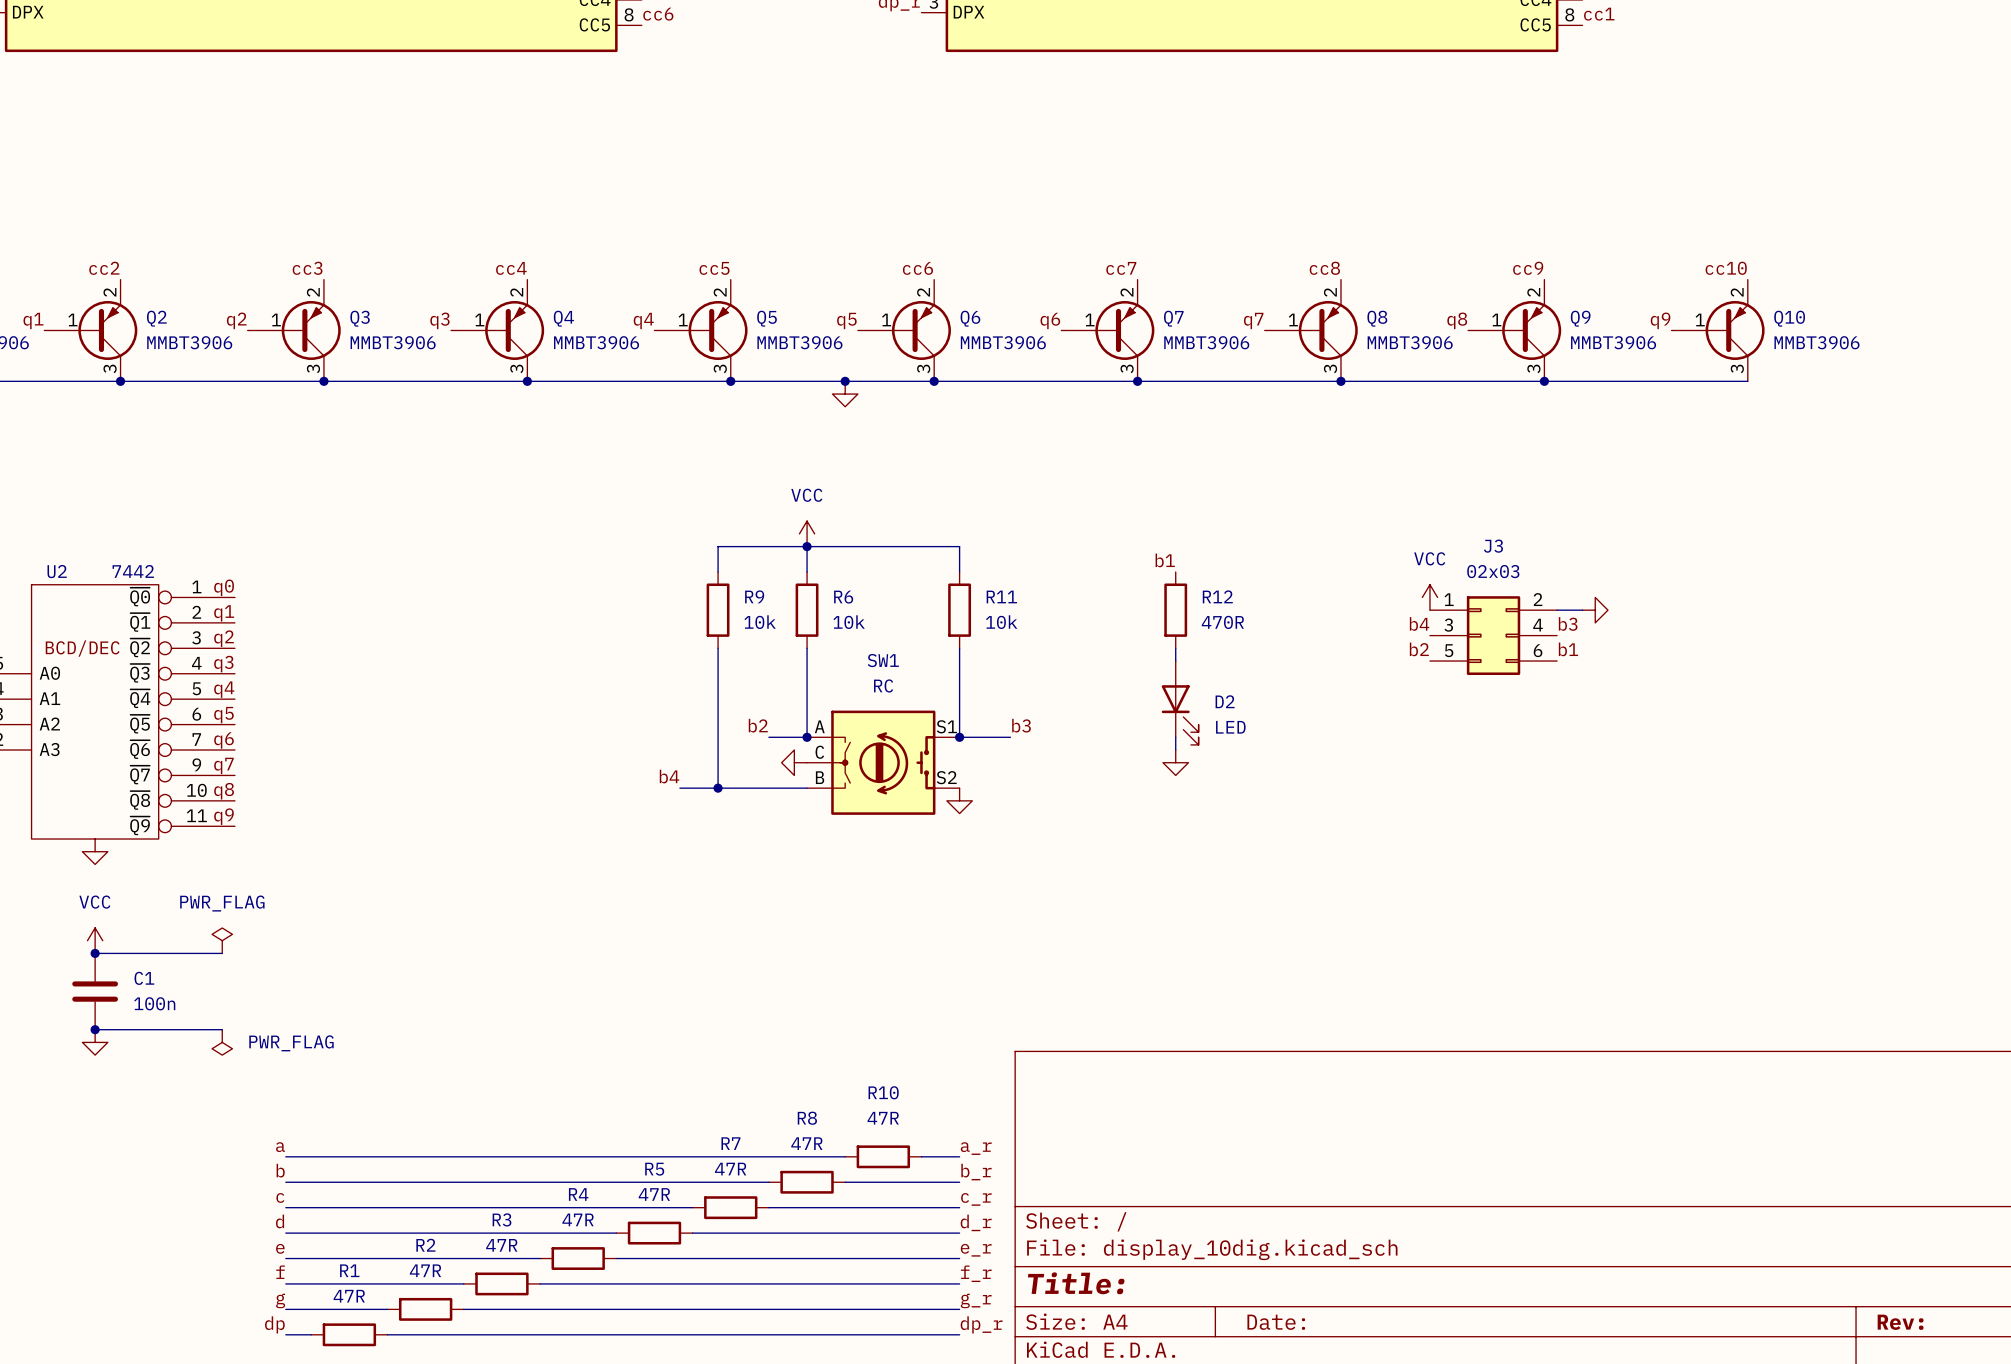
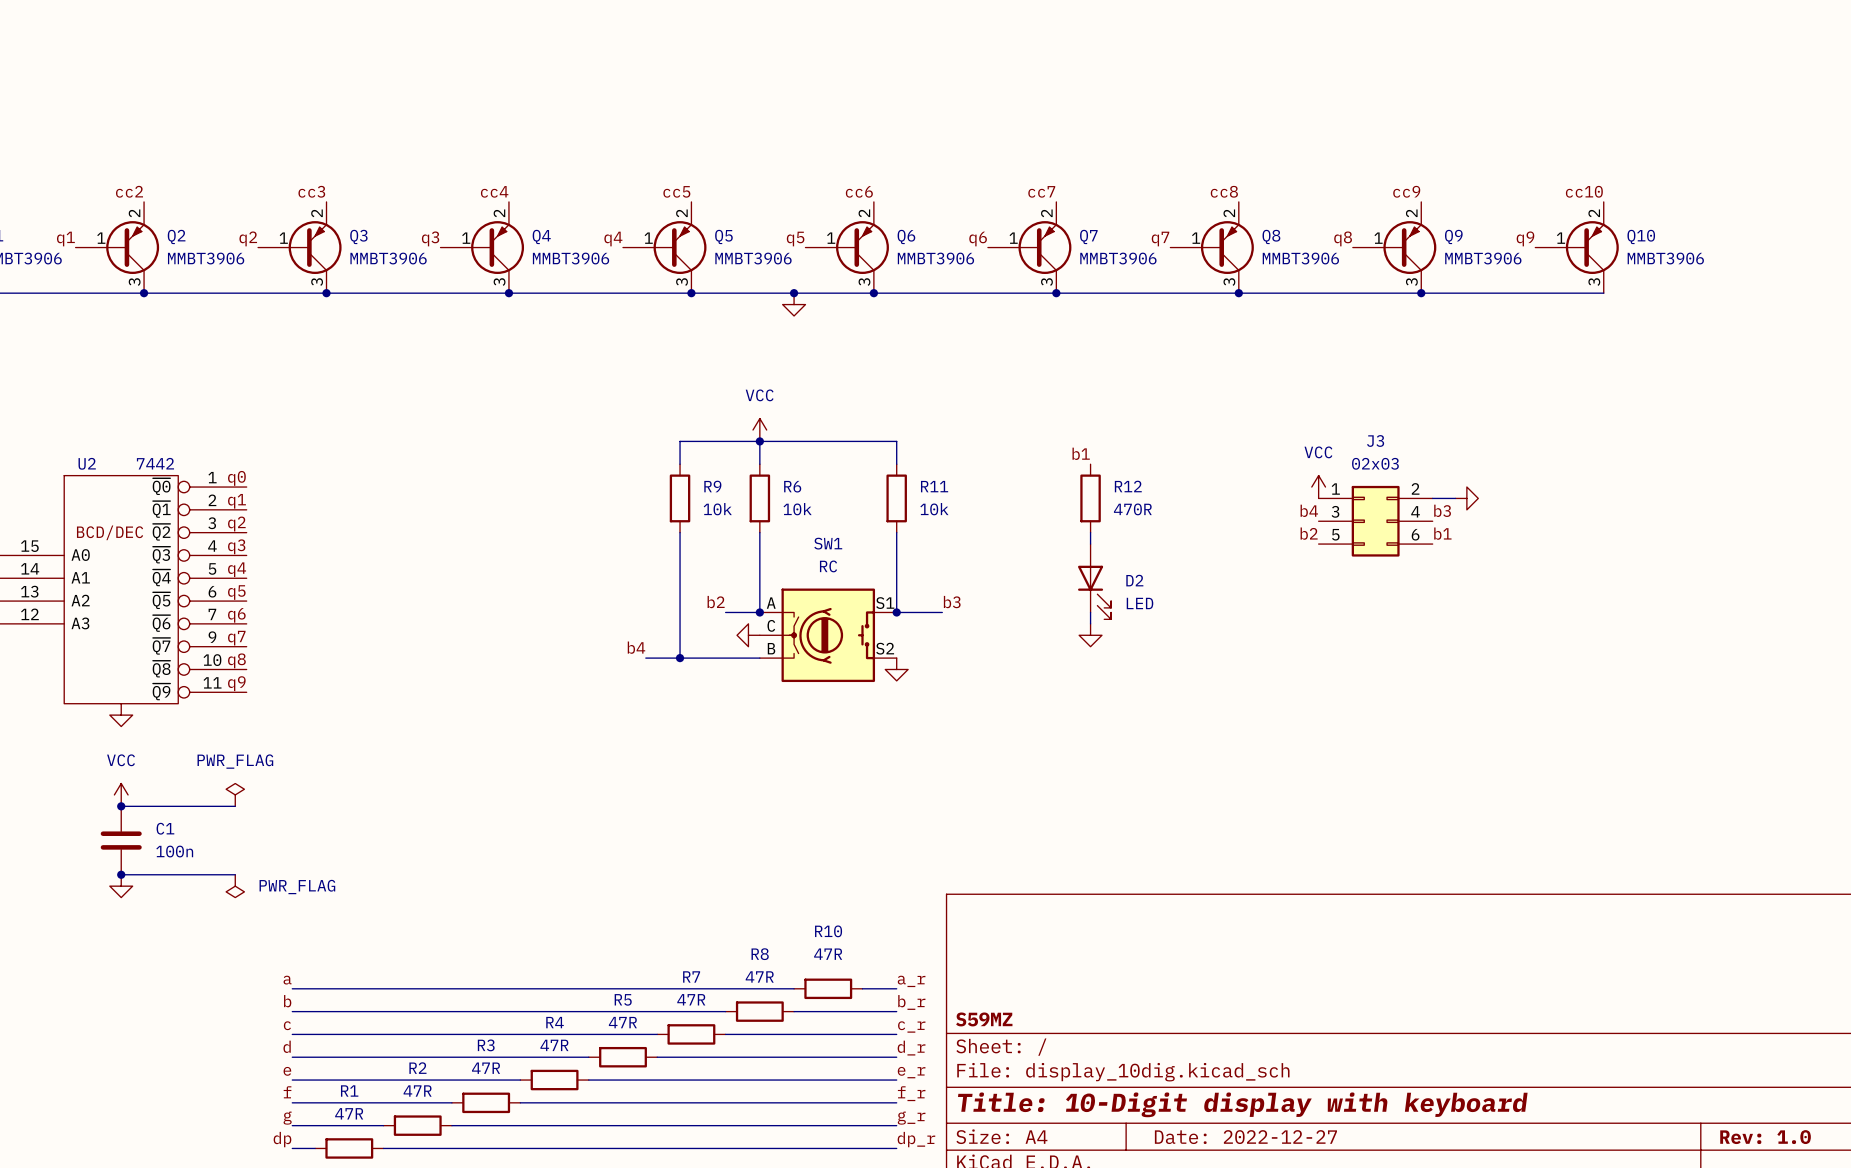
SW1 symbol: [807, 710, 960, 815] -> [759, 588, 897, 683]
title block: none -> S59MZ (984, 1019)
title block: Title: (1076, 1283) -> Title: 10-Digit display with keyboard (1242, 1104)
title block: Date: (1276, 1322) -> Date: 2022-12-27 (1245, 1137)
title block: Rev: (1900, 1322) -> Rev: 1.0 (1765, 1137)

